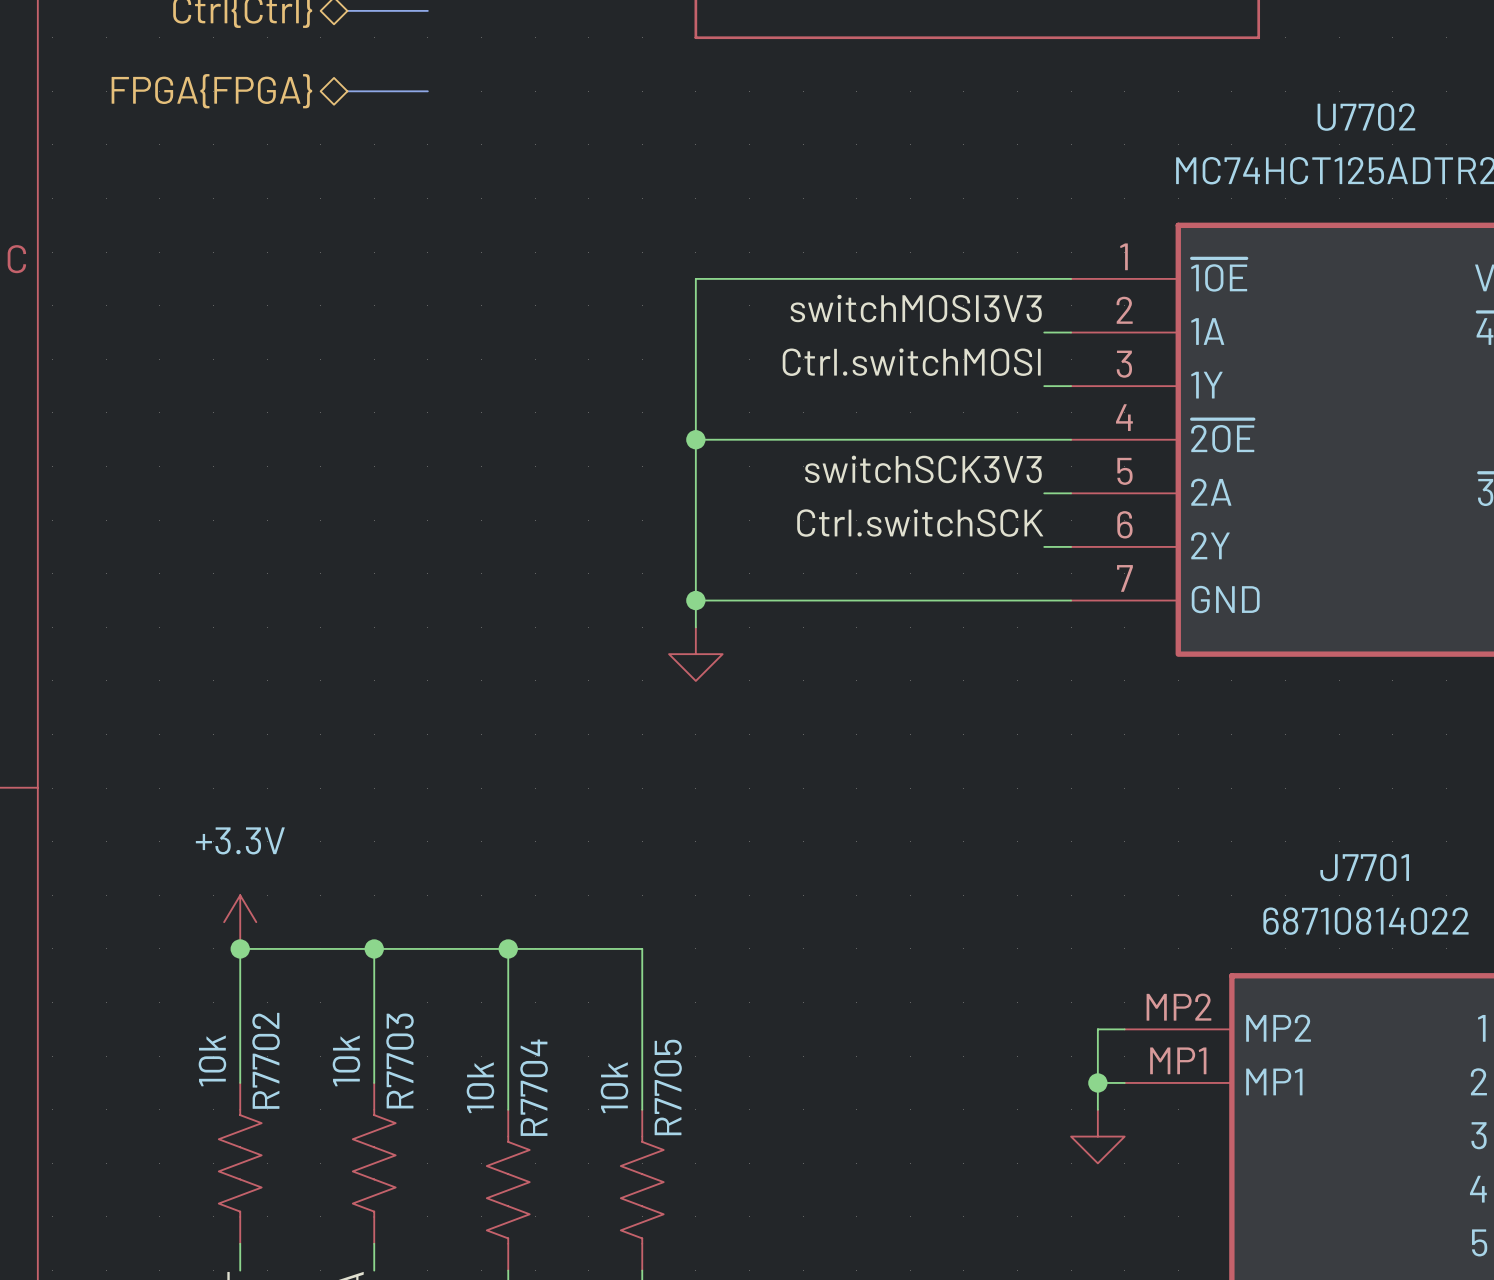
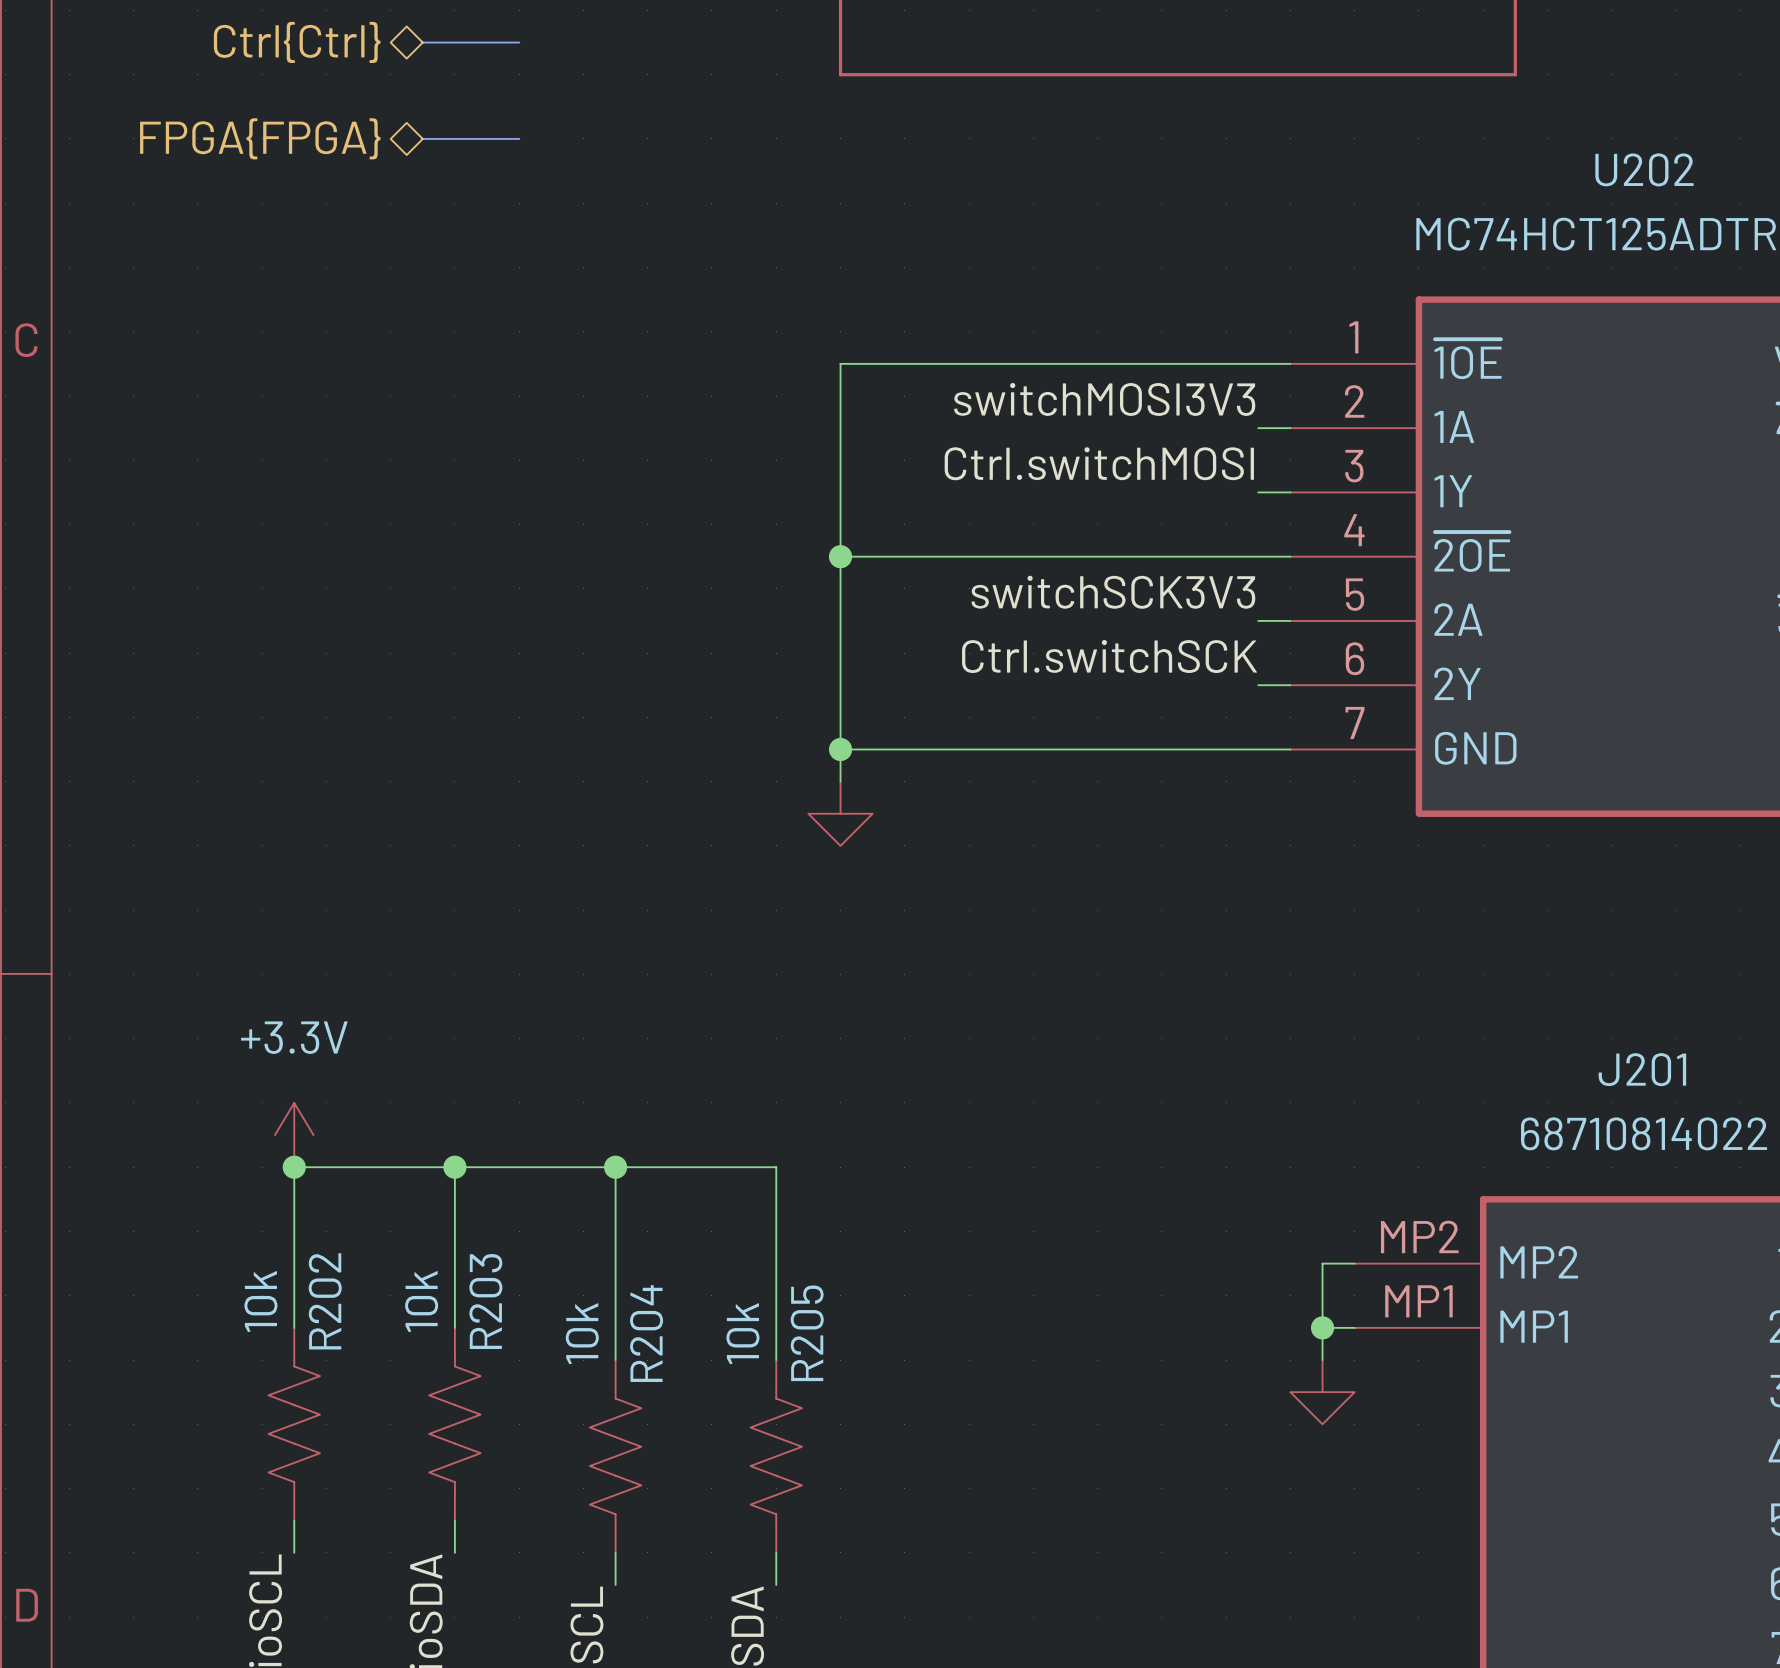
U7702 name: U7702 (1366, 117) -> U202 (1644, 169)
J7701 name: J7701 (1364, 867) -> J201 (1642, 1069)
R7702 name: R7702 (266, 1060) -> R202 (325, 1301)
R7703 name: R7703 (400, 1060) -> R203 (485, 1301)
R7704 name: R7704 (534, 1087) -> R204 (646, 1333)
R7705 name: R7705 (668, 1087) -> R205 (807, 1333)

